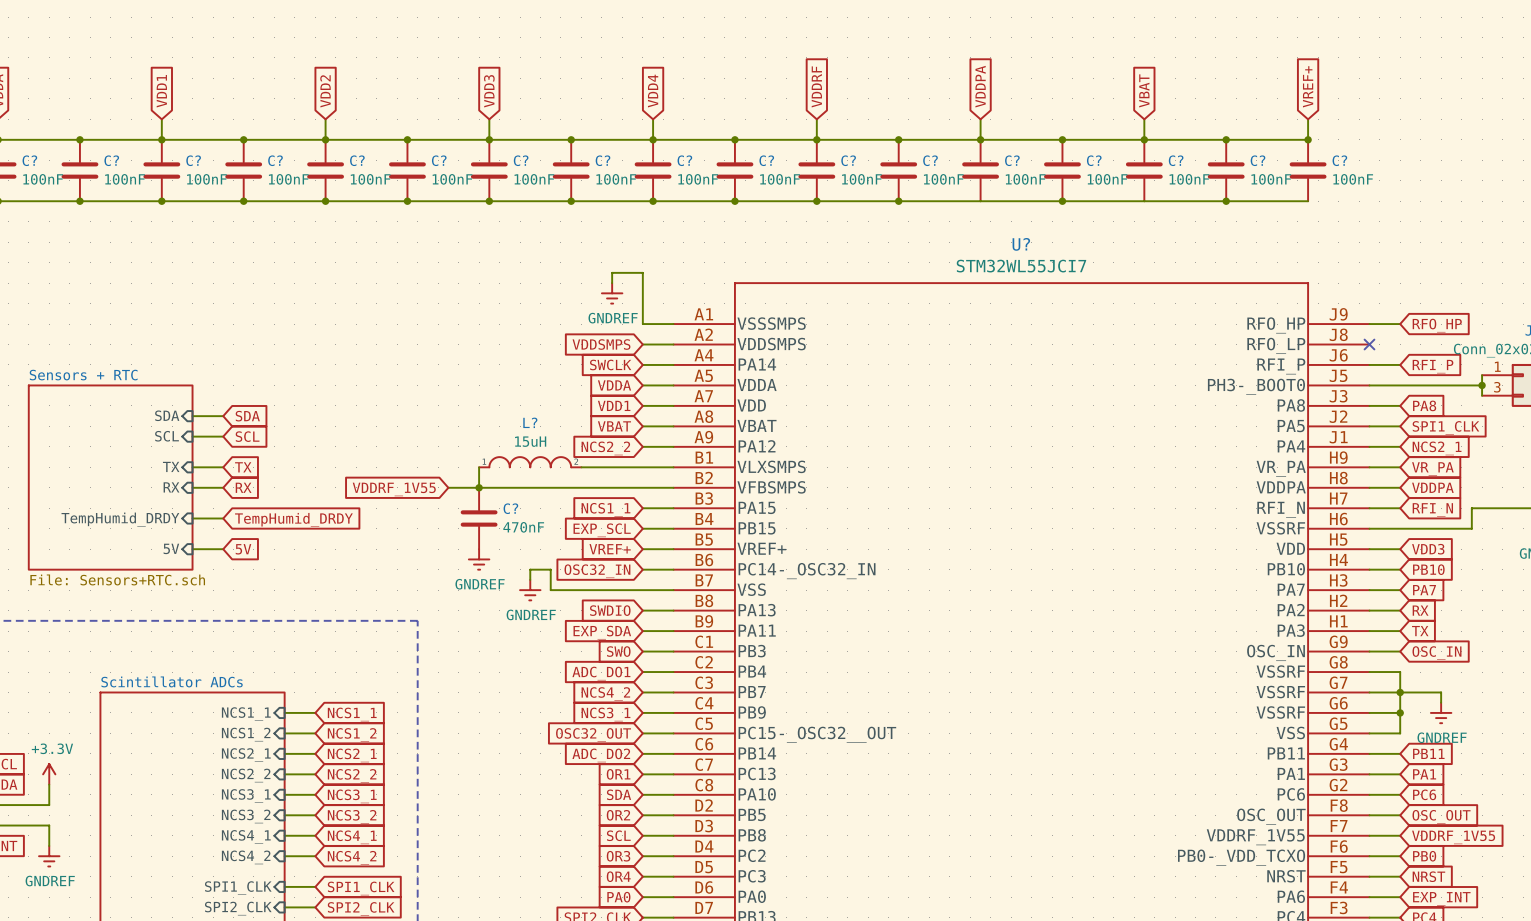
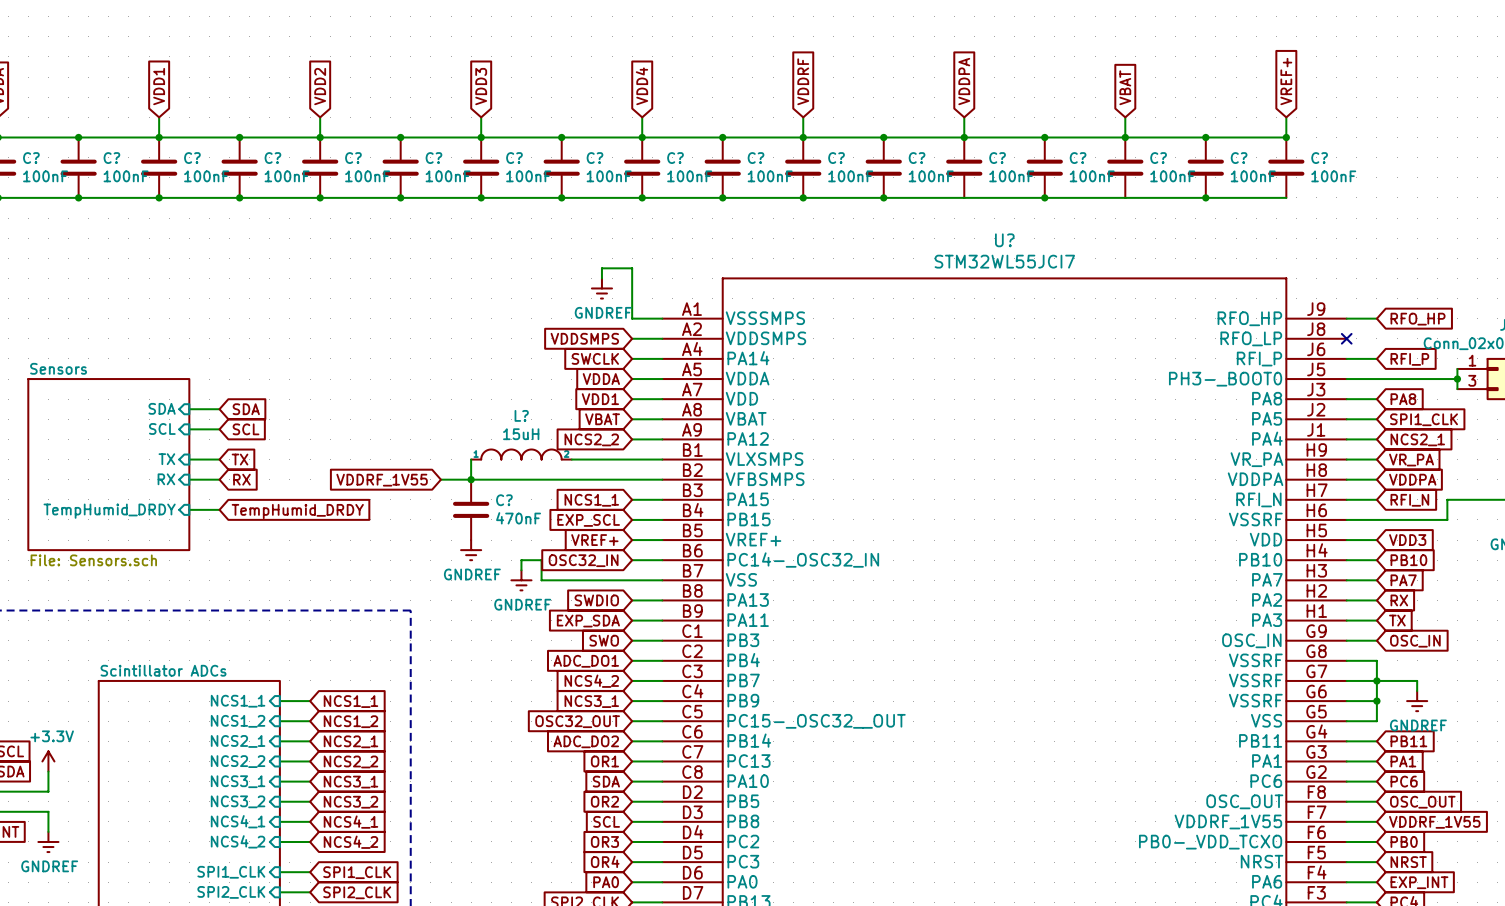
sheet Sensors: none -> File: Sensors.sch (108, 464)
sheet Sensors + RTC: File: Sensors+RTC.sch (110, 477) -> none
sheet pin: 5V (171, 548) -> none
wire: (192, 549) (223, 549) -> none
global label: 5V (243, 549) -> none

